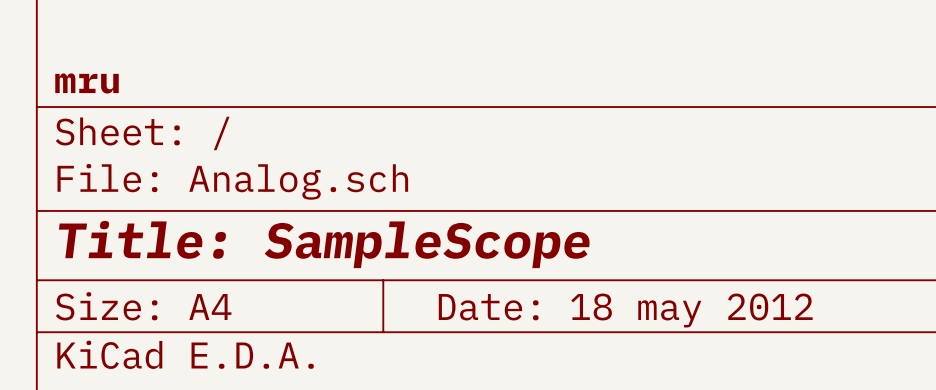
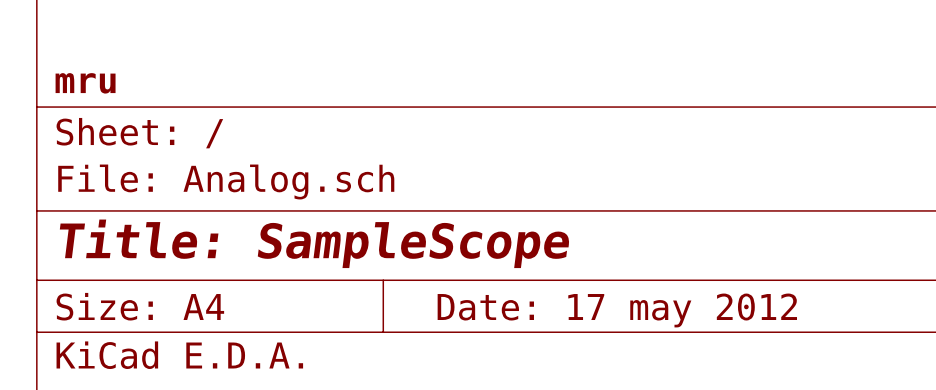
title block: Date: 18 may 2012 (625, 310) -> Date: 17 may 2012 (617, 310)

